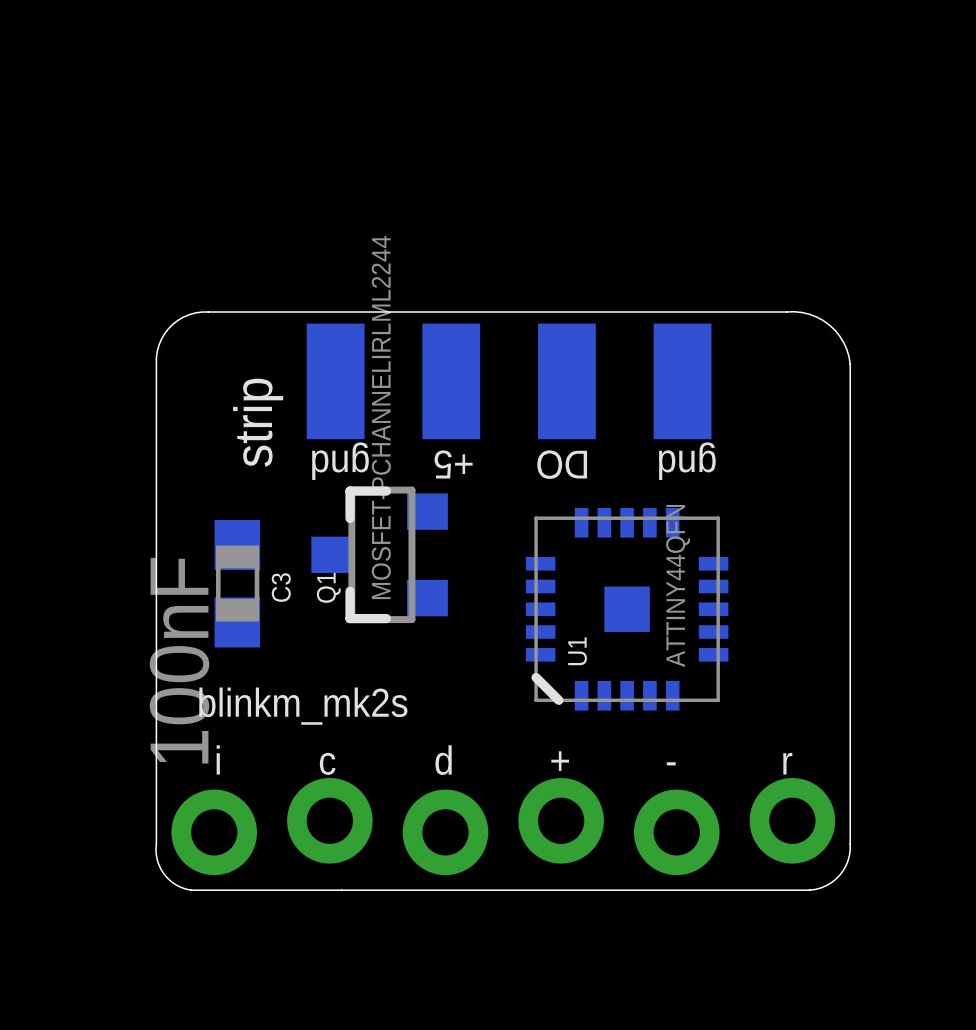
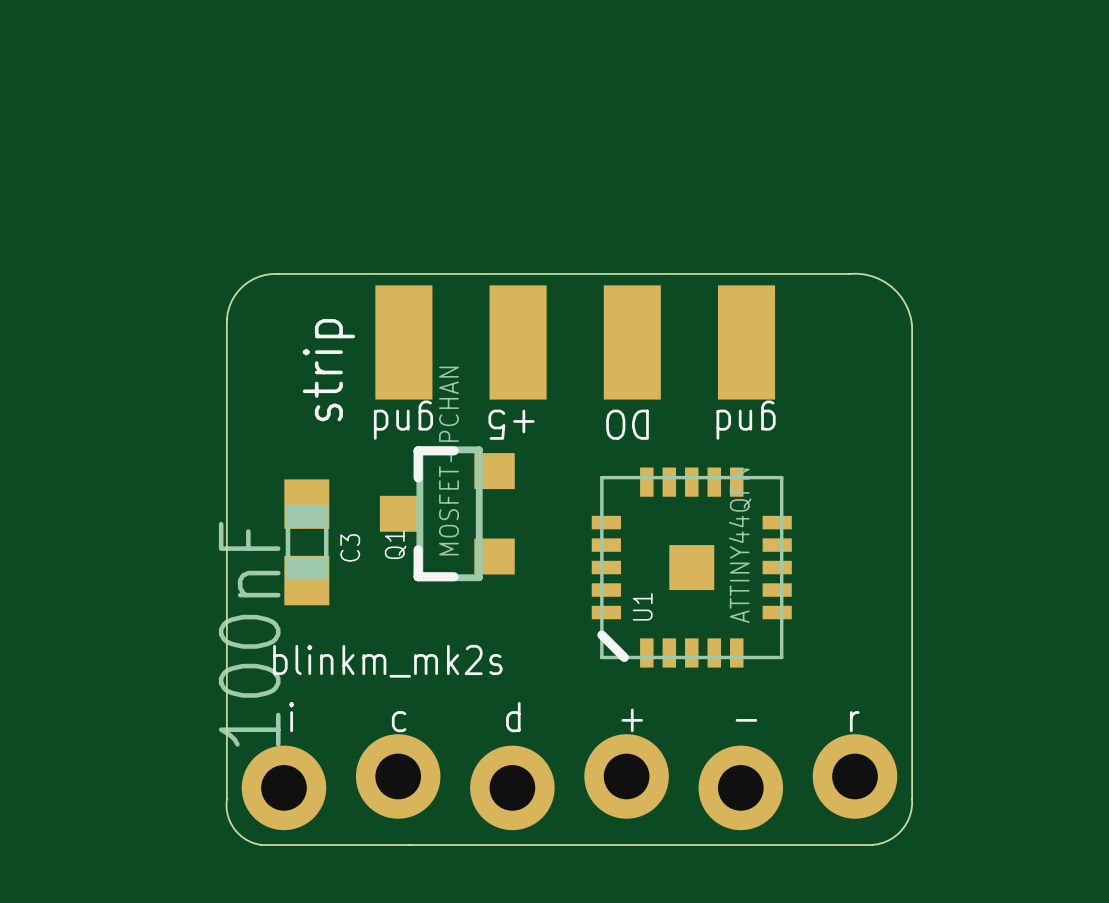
Q1 value: MOSFET-PCHANNELIRLML2244 (381, 417) -> MOSFET-PCHAN (449, 461)

